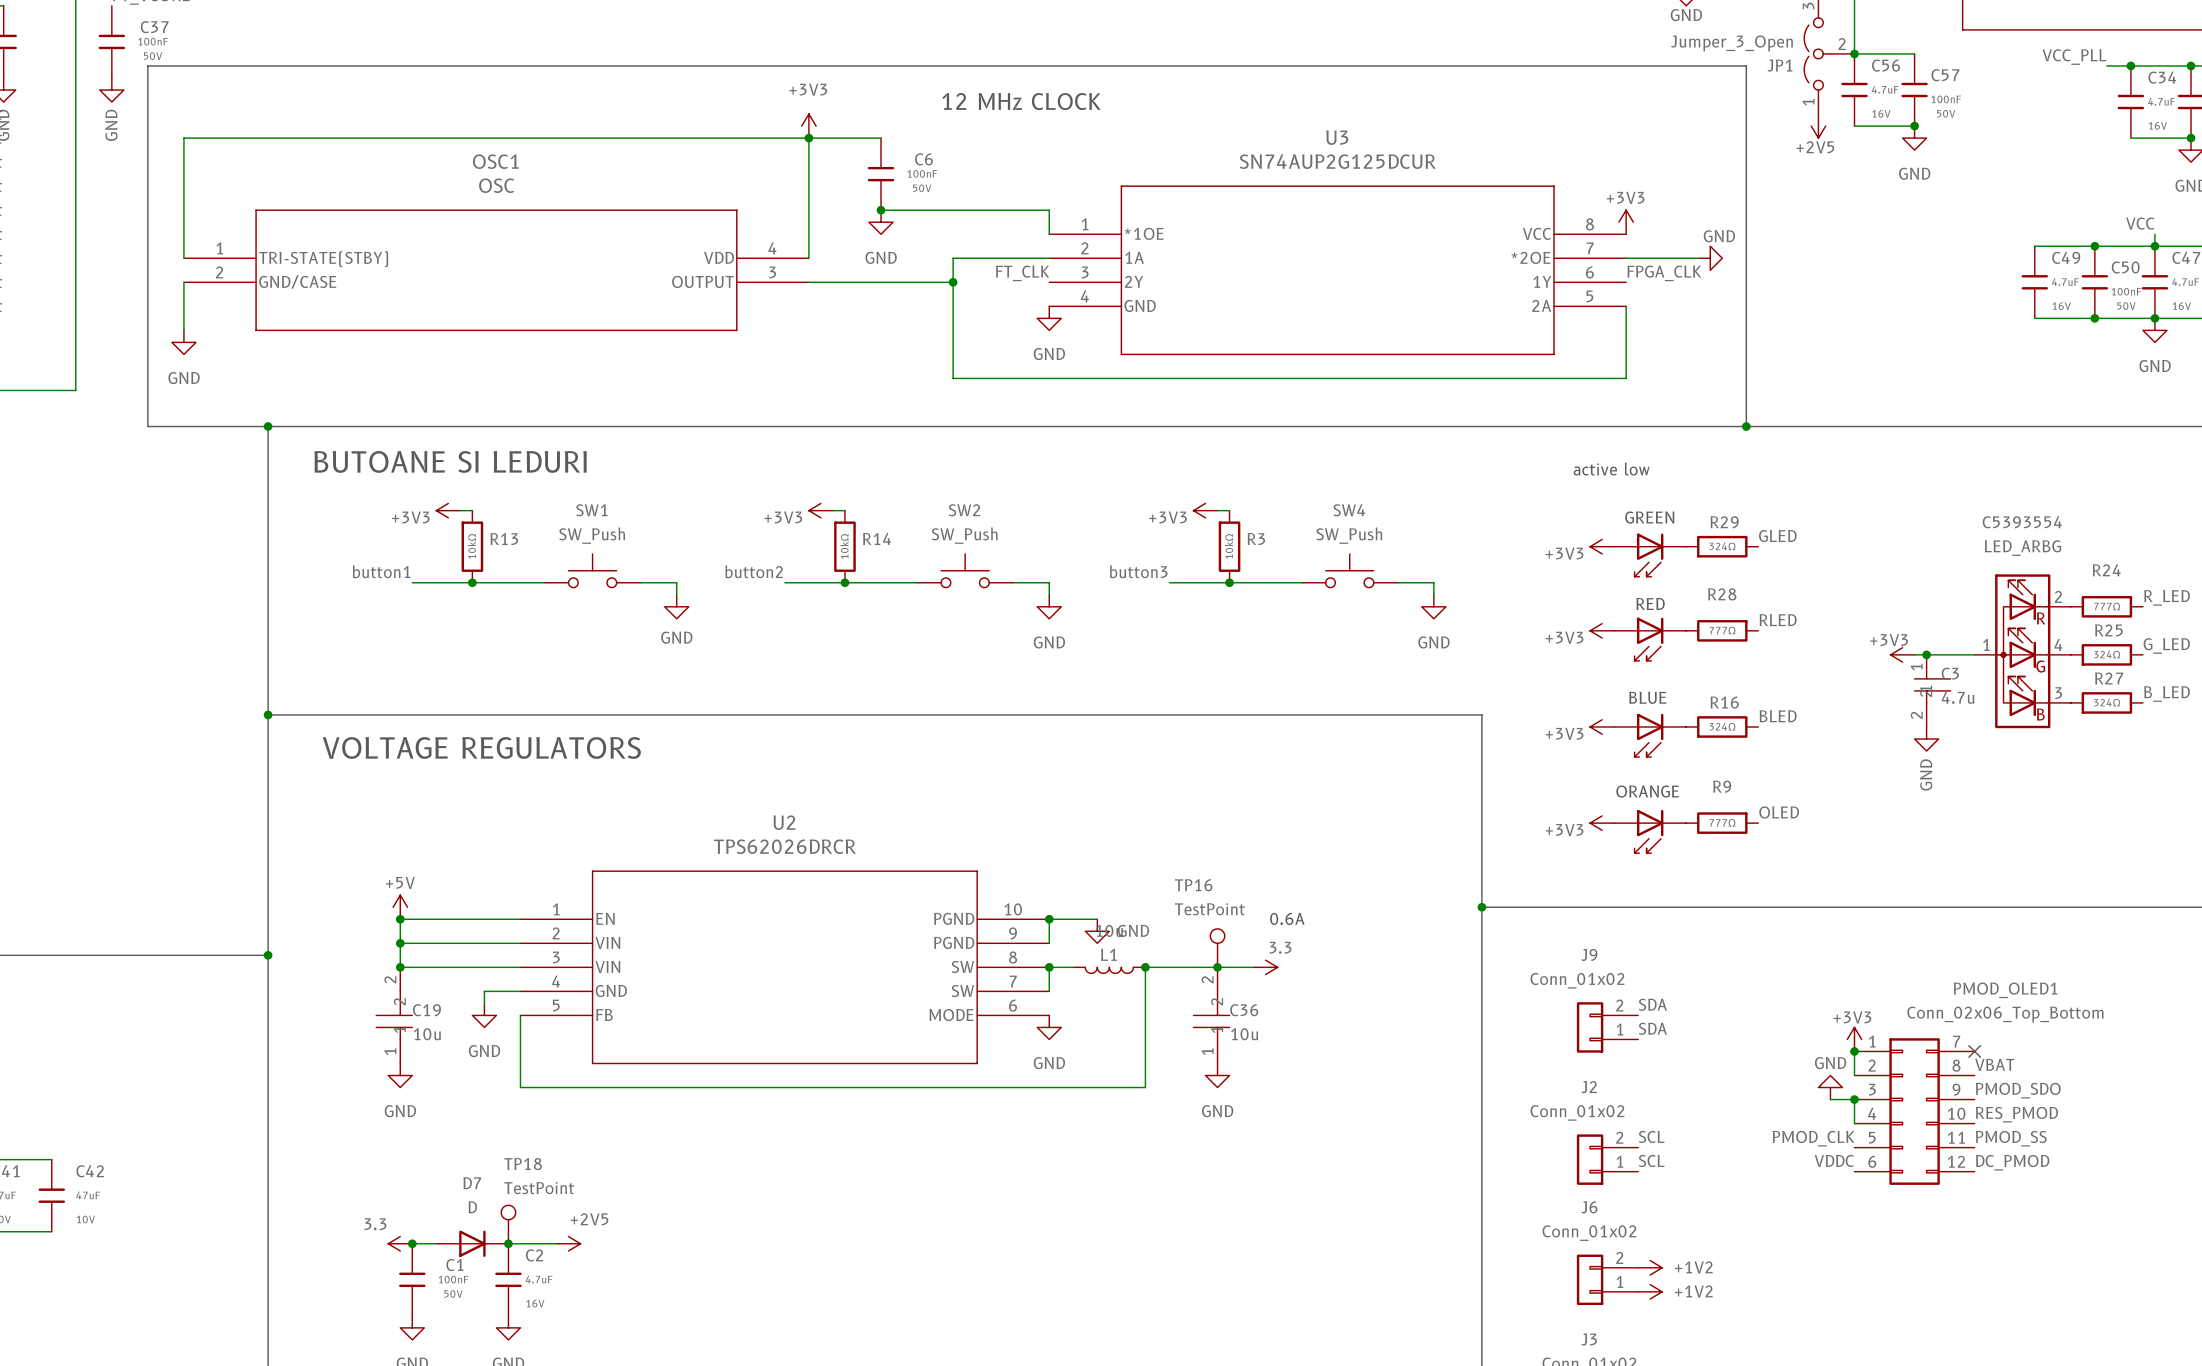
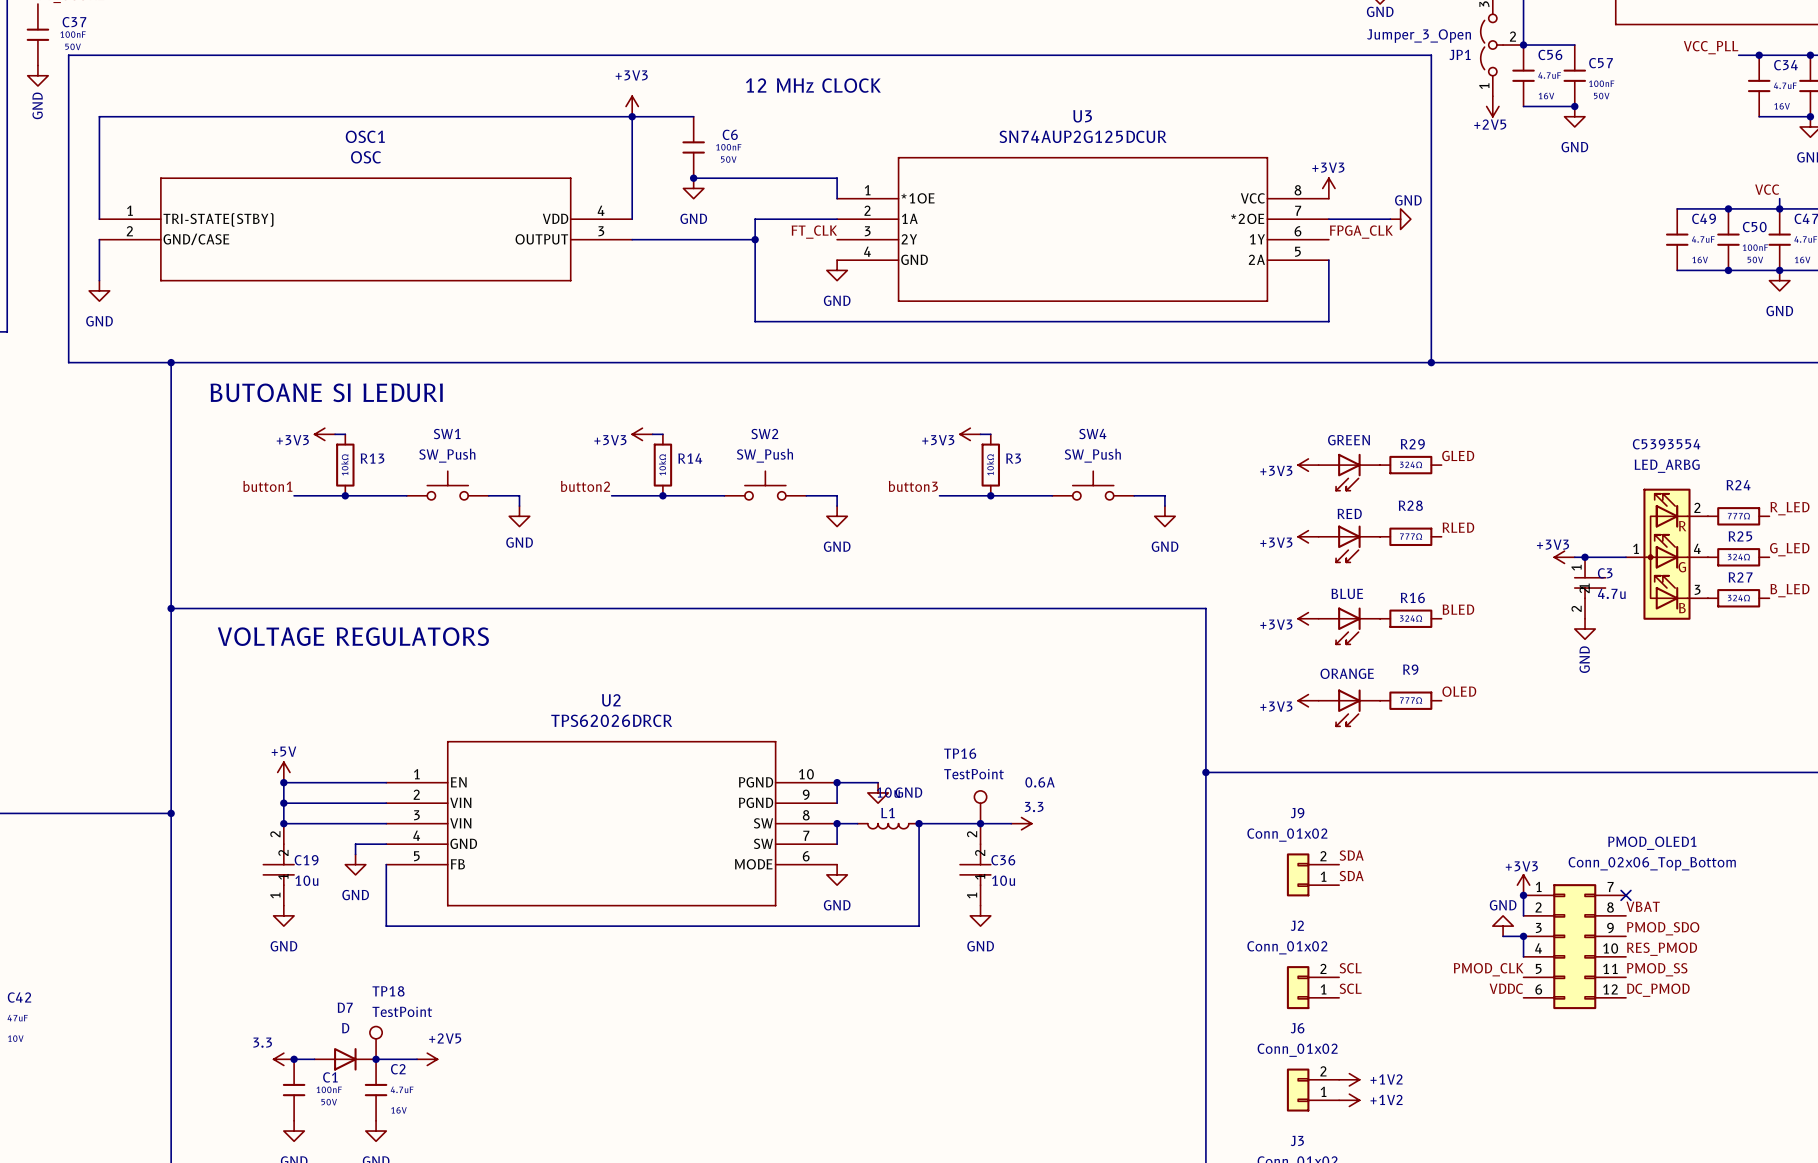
text: active low (1611, 469) -> none

